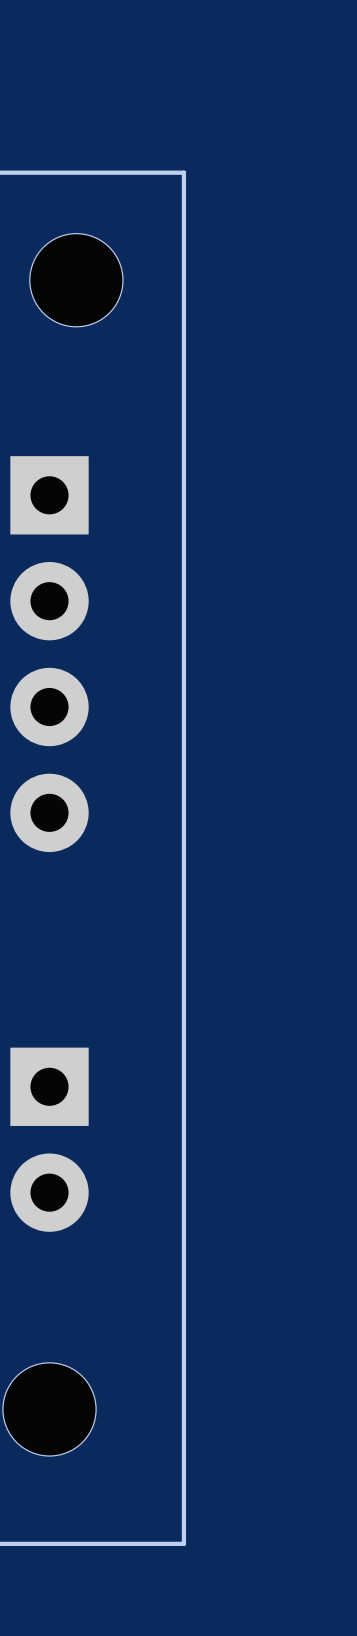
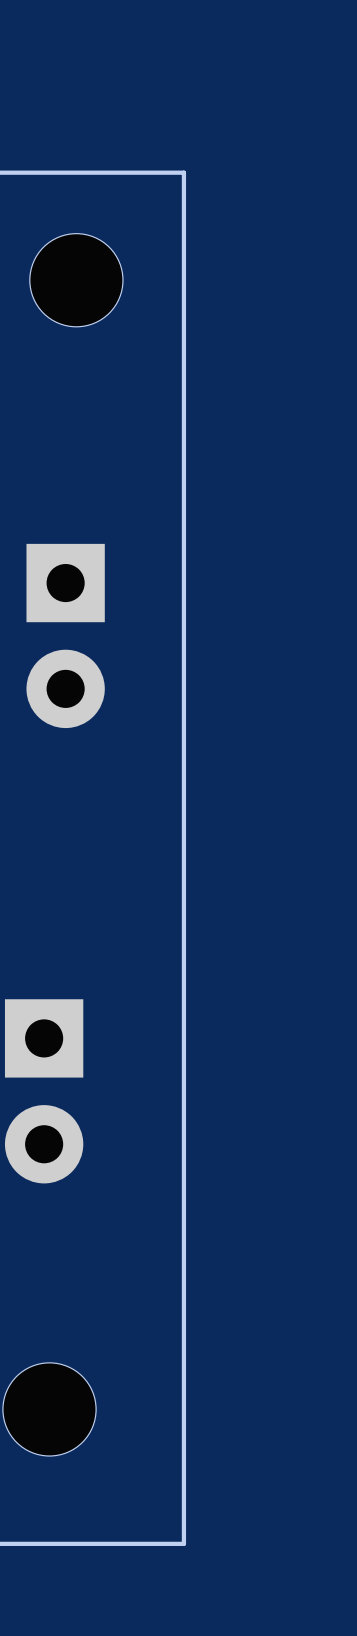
part footprint: [10, 456, 89, 853] -> [26, 543, 105, 729]
part position: (49, 1139) -> (44, 1091)

